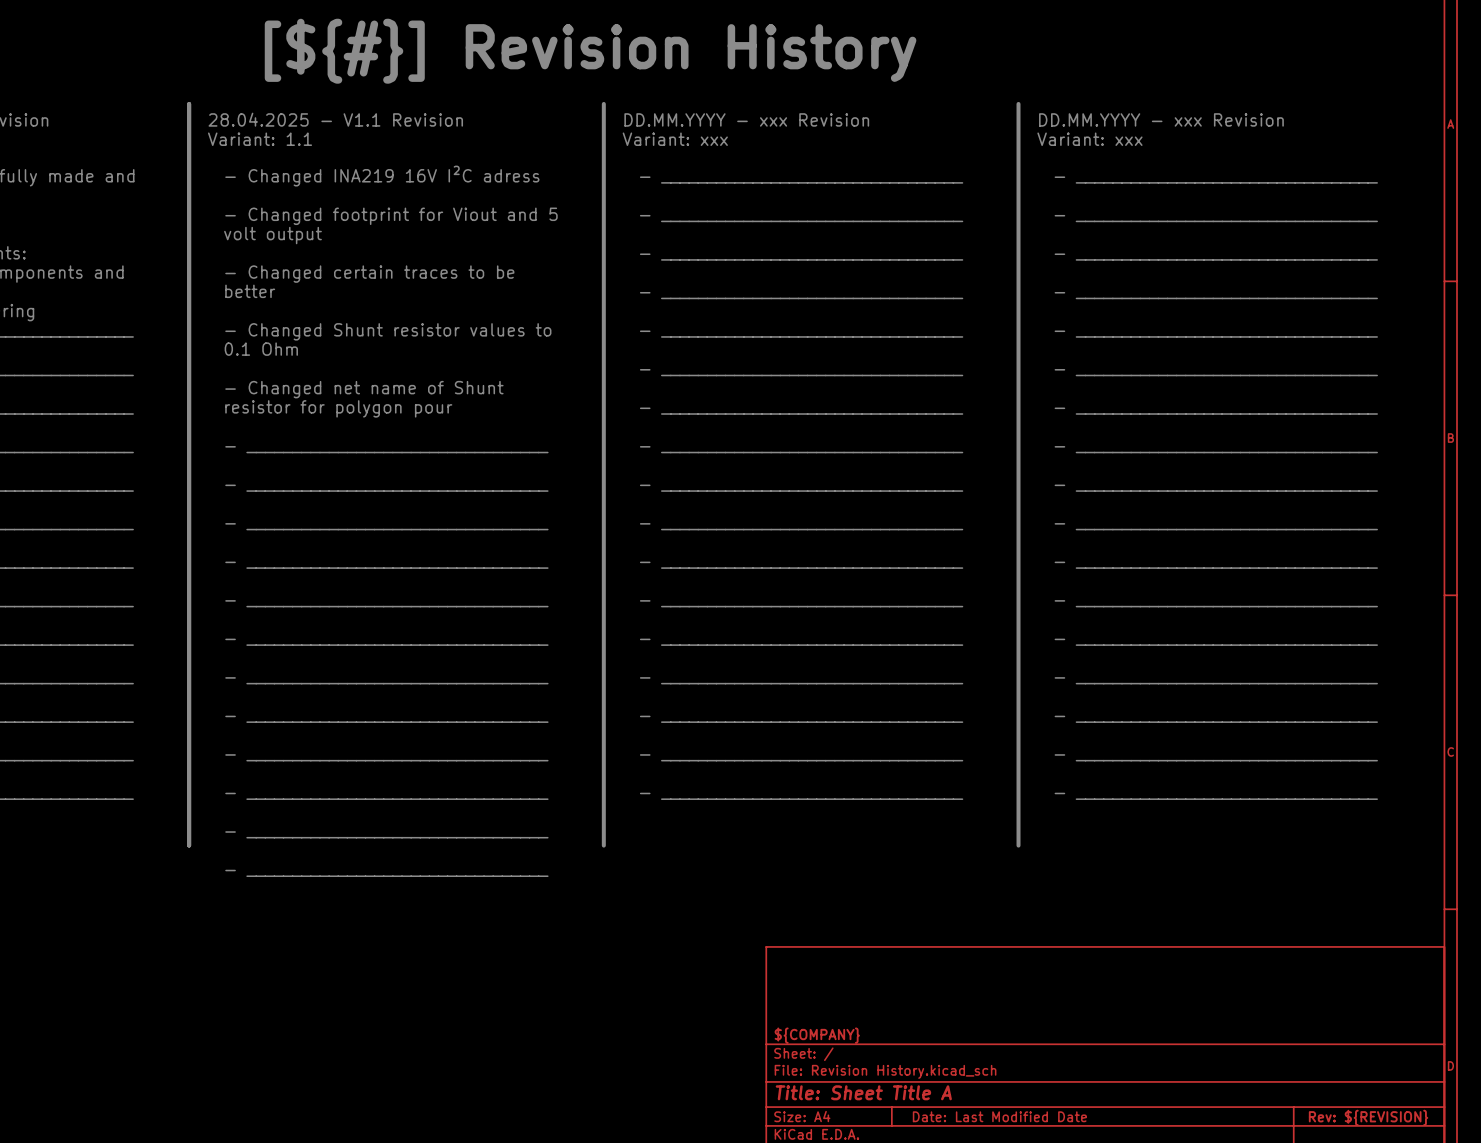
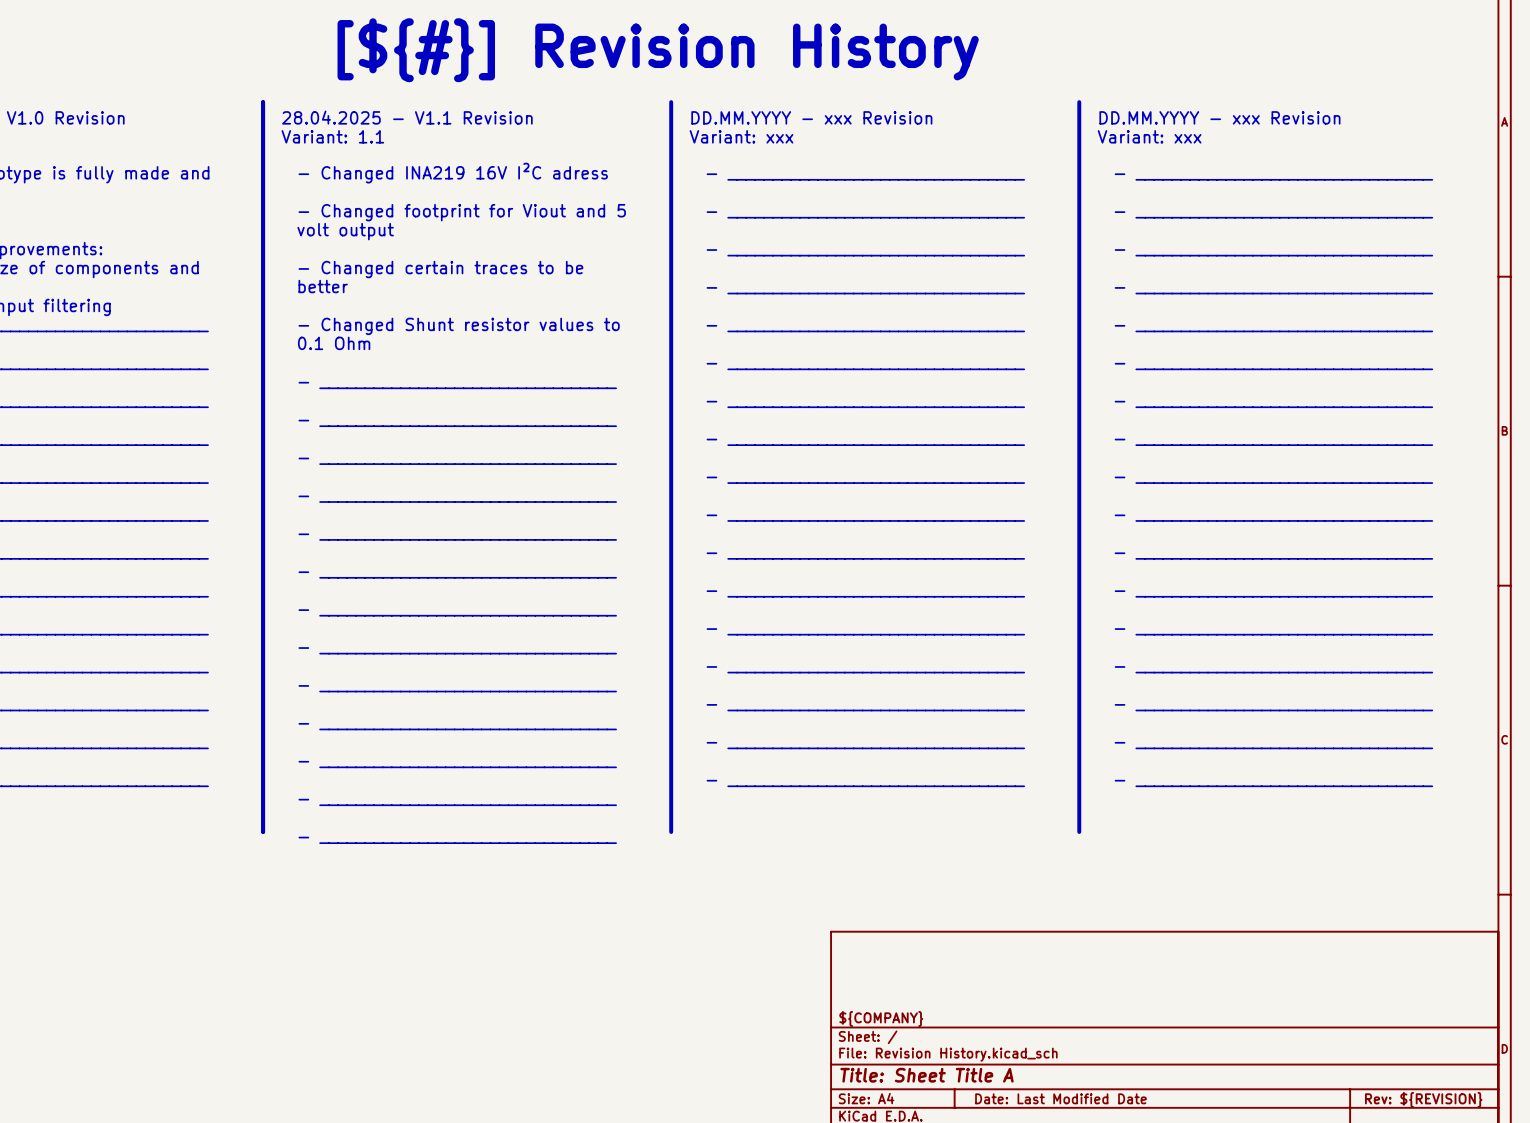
text: - Changed net name of Shunt (364, 389) -> - _________________________________ (457, 385)
text: resistor for polygon pour (338, 408) -> none
text: none -> - _________________________________ (457, 423)
text: - _________________________________ (386, 449) -> none
text: none -> - _________________________________ (457, 461)
text: - _________________________________ (386, 488) -> none
text: none -> - _________________________________ (457, 499)
text: - _________________________________ (386, 526) -> none
text: none -> - _________________________________ (457, 537)
text: - _________________________________ (386, 565) -> none
text: none -> - _________________________________ (457, 575)
text: - _________________________________ (386, 603) -> none
text: none -> - _________________________________ (457, 612)
text: - _________________________________ (386, 642) -> none
text: none -> - _________________________________ (457, 650)
text: - _________________________________ (386, 680) -> none
text: none -> - _________________________________ (457, 688)
text: - _________________________________ (386, 719) -> none
text: none -> - _________________________________ (457, 726)
text: - _________________________________ (386, 757) -> none
text: none -> - _________________________________ (457, 764)
text: - _________________________________ (386, 796) -> none
text: none -> - _________________________________ (457, 802)
text: - _________________________________ (386, 834) -> none
text: none -> - _________________________________ (457, 840)
text: - _________________________________ (386, 873) -> none

